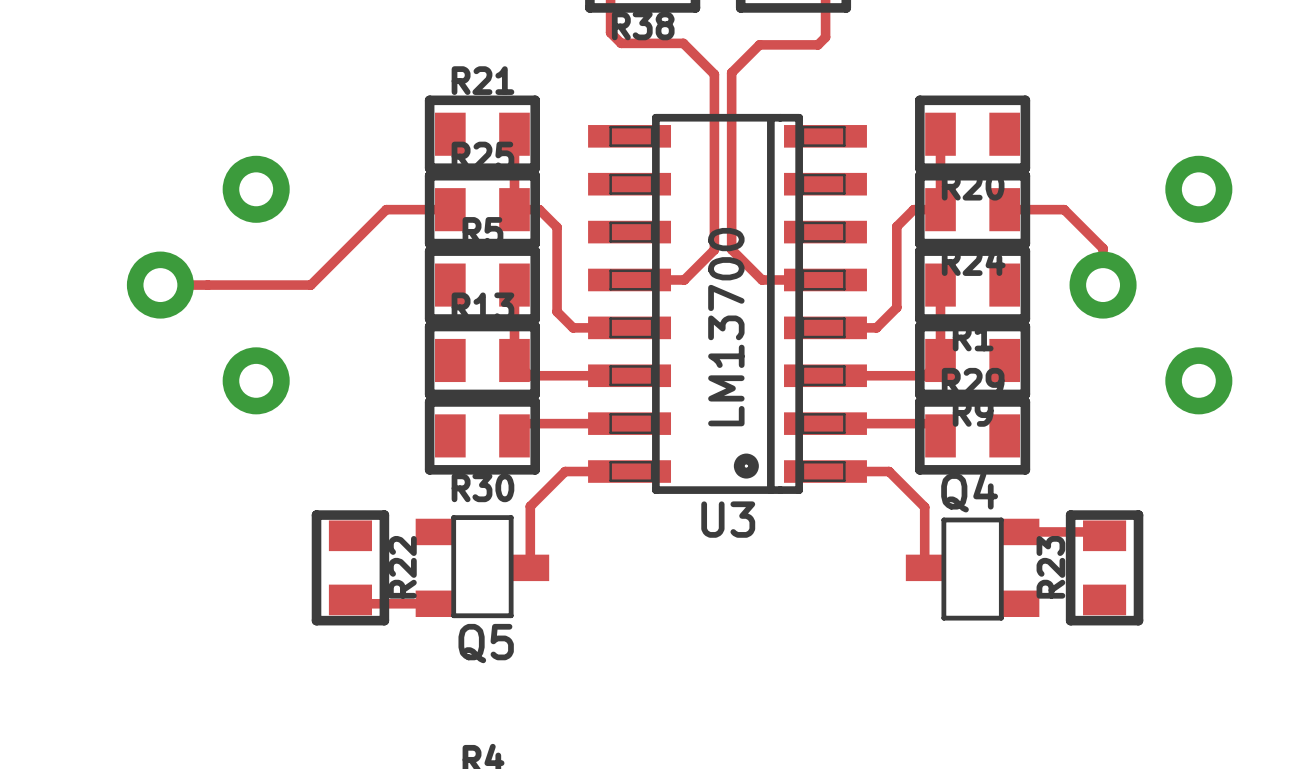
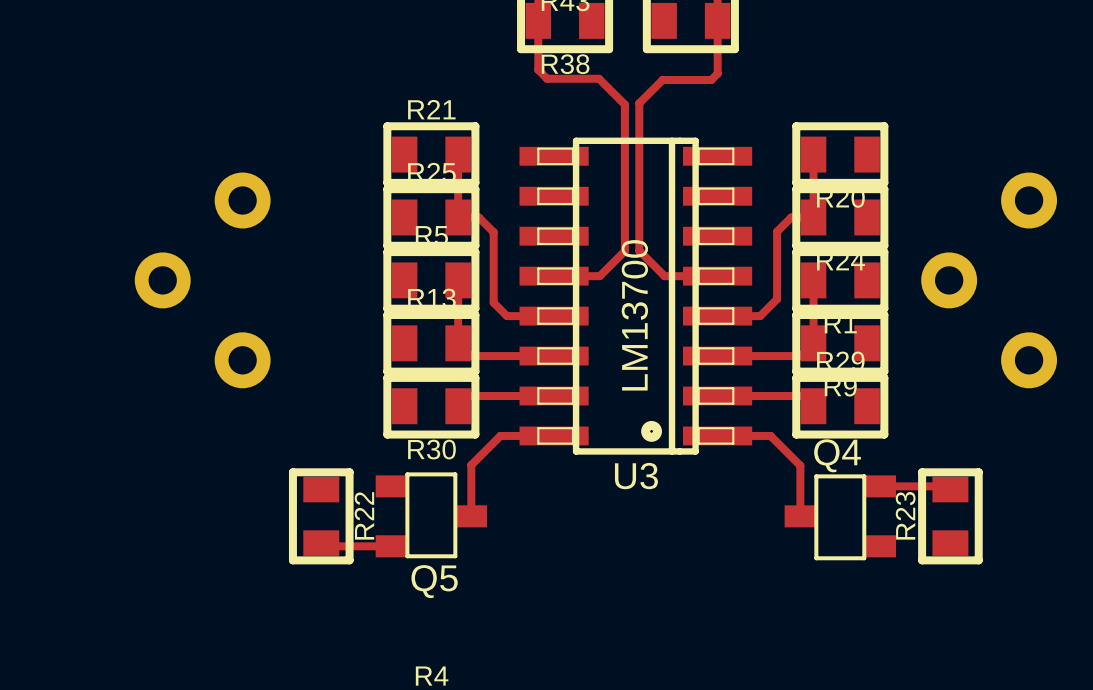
top track: (450, 209) (386, 209) (310, 285) (160, 285) -> none
top track: (1004, 209) (1064, 209) (1103, 248) (1103, 285) -> none

